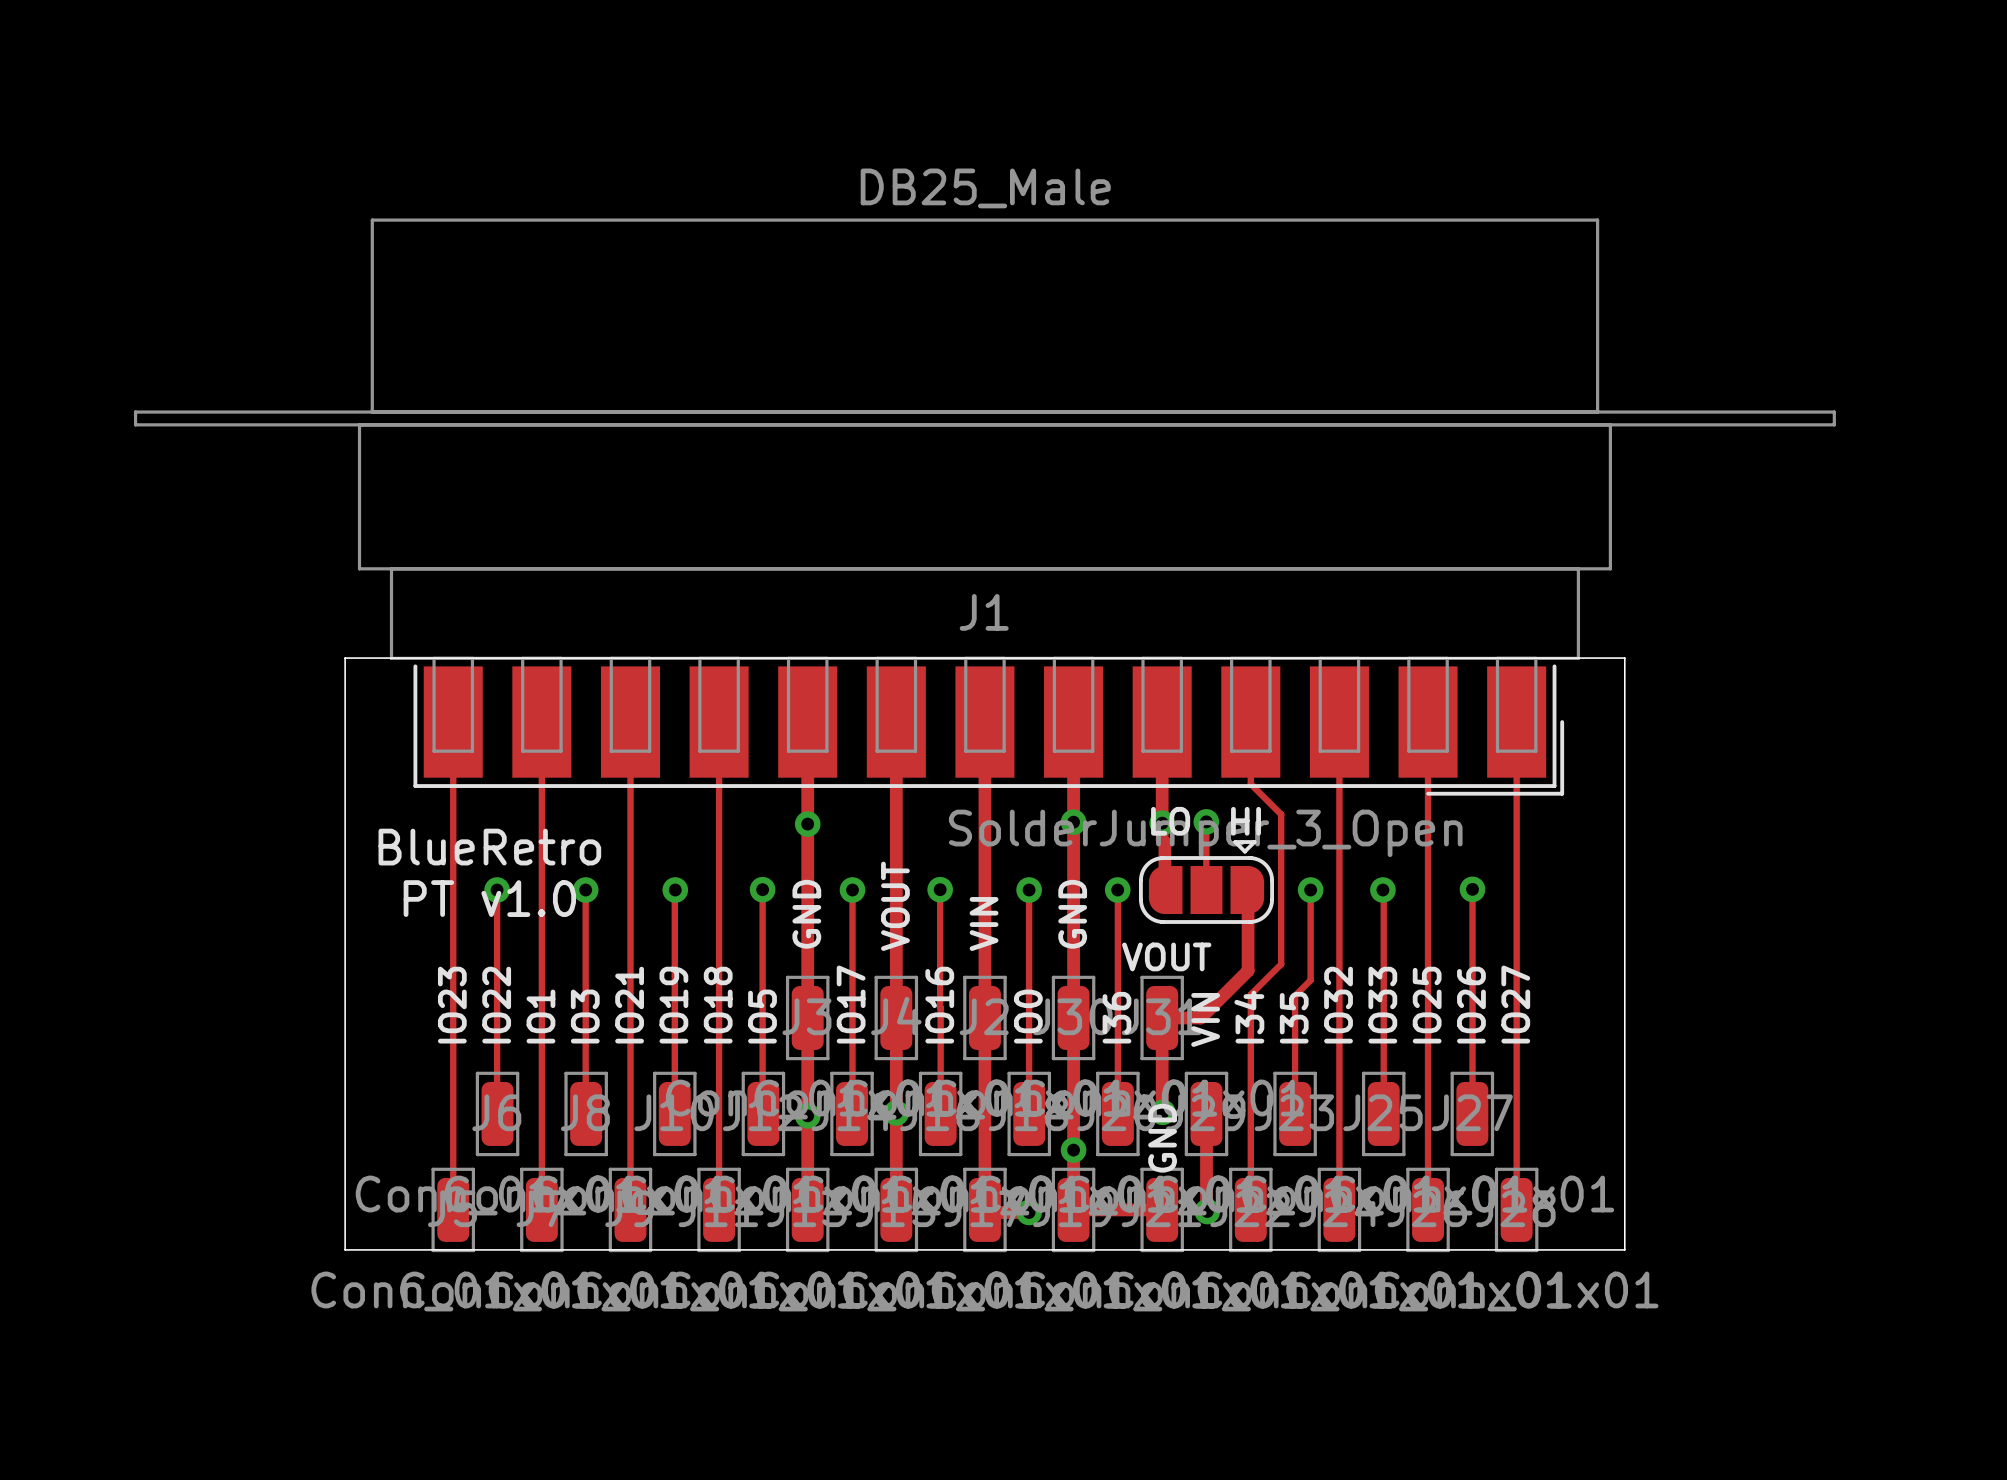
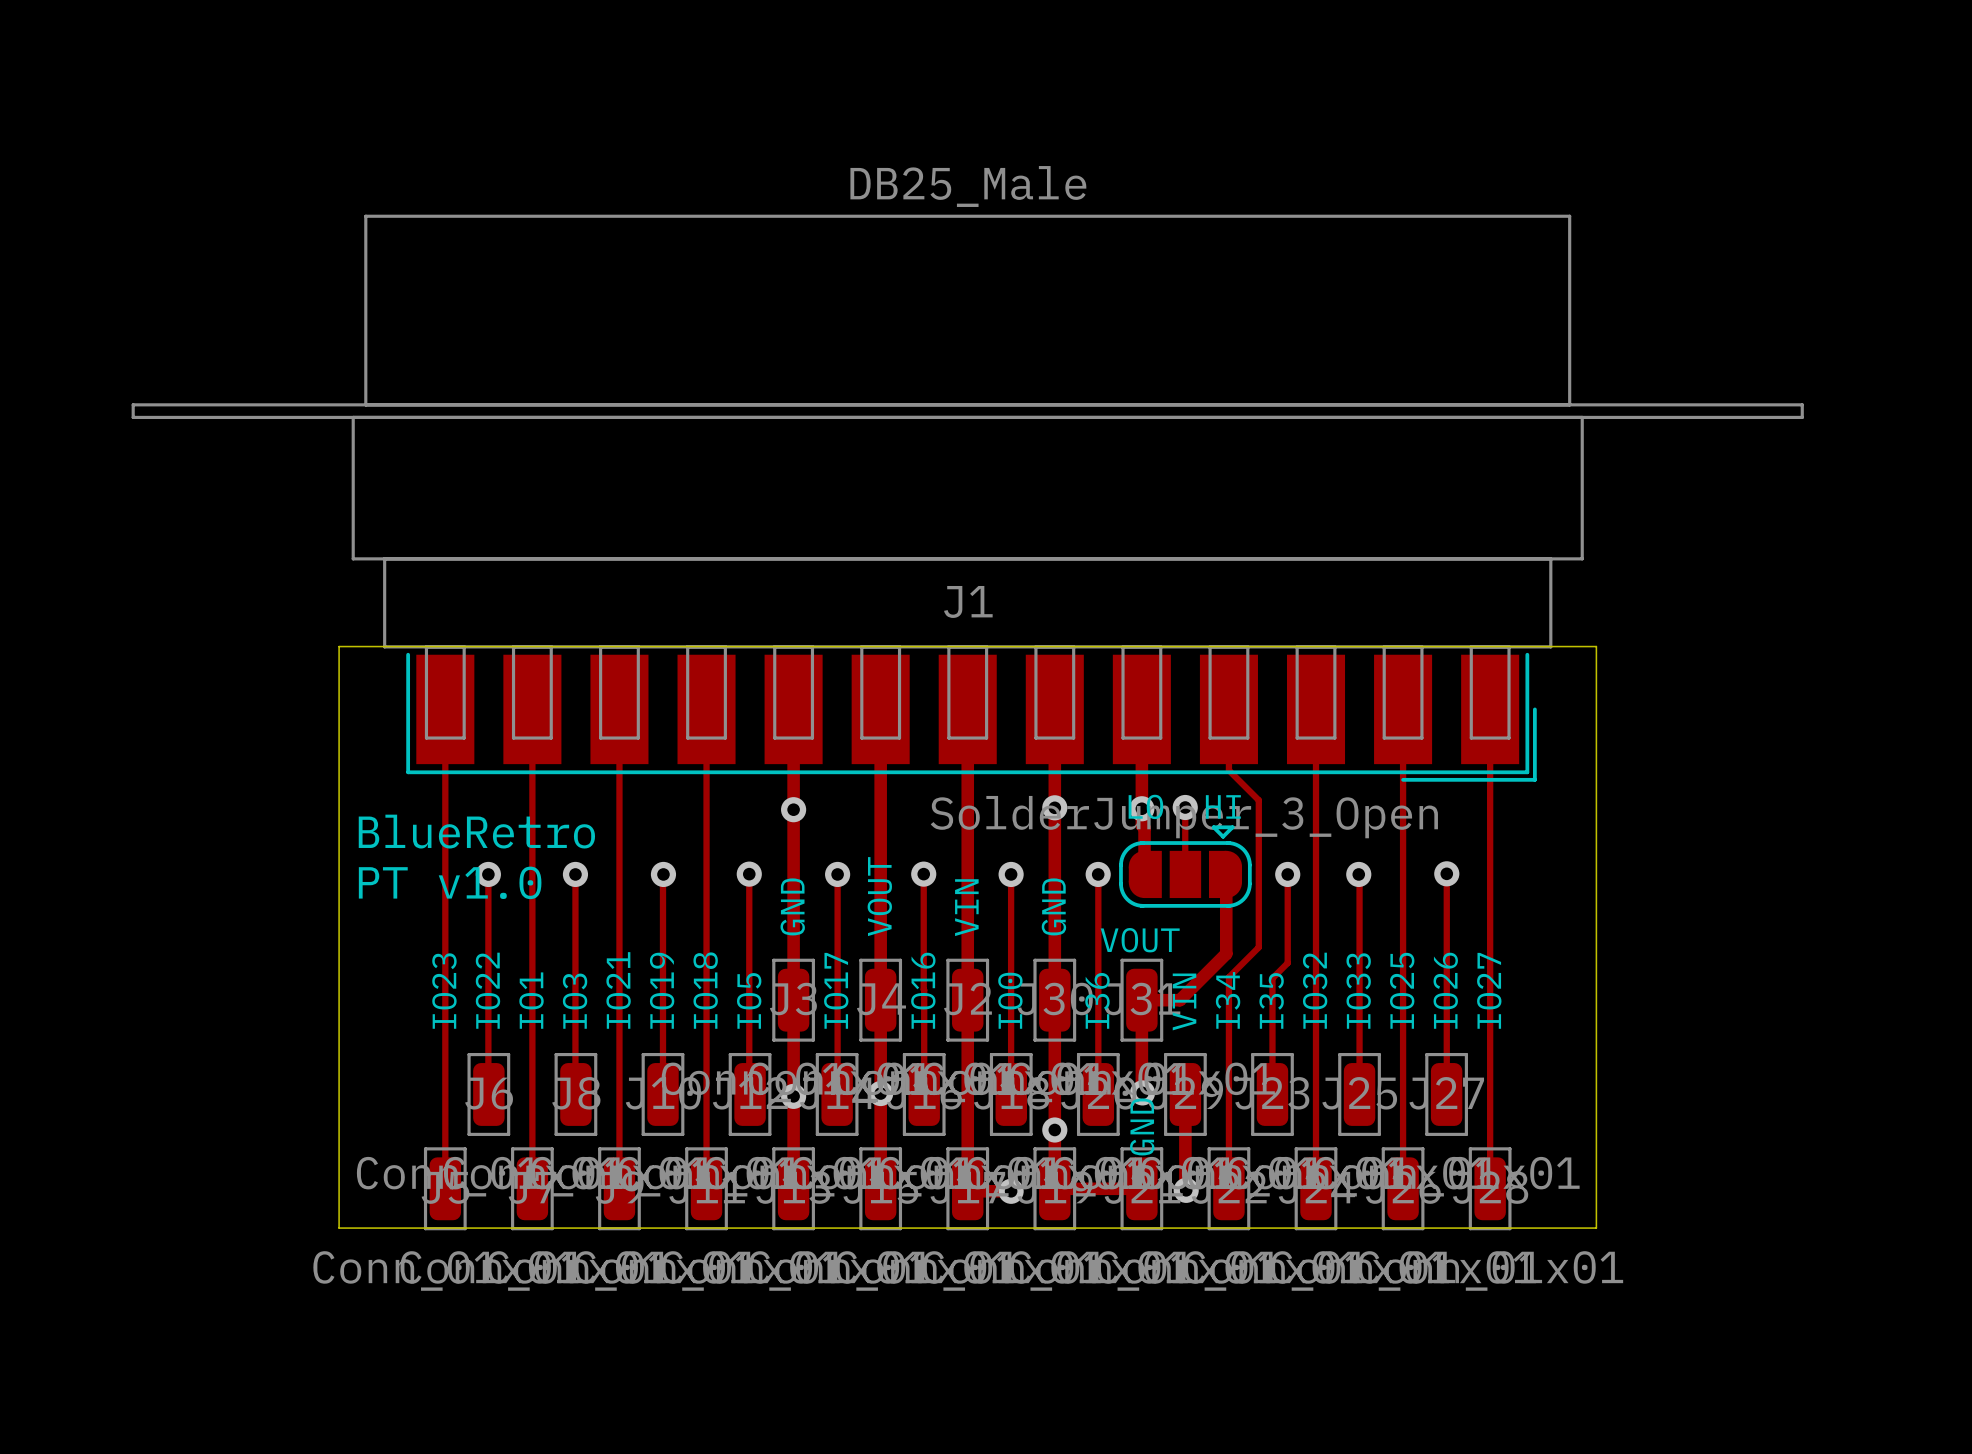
text position: BlueRetro (489, 847) -> BlueRetro (476, 831)
text position: PT v1.0 (489, 898) -> PT v1.0 (450, 882)

